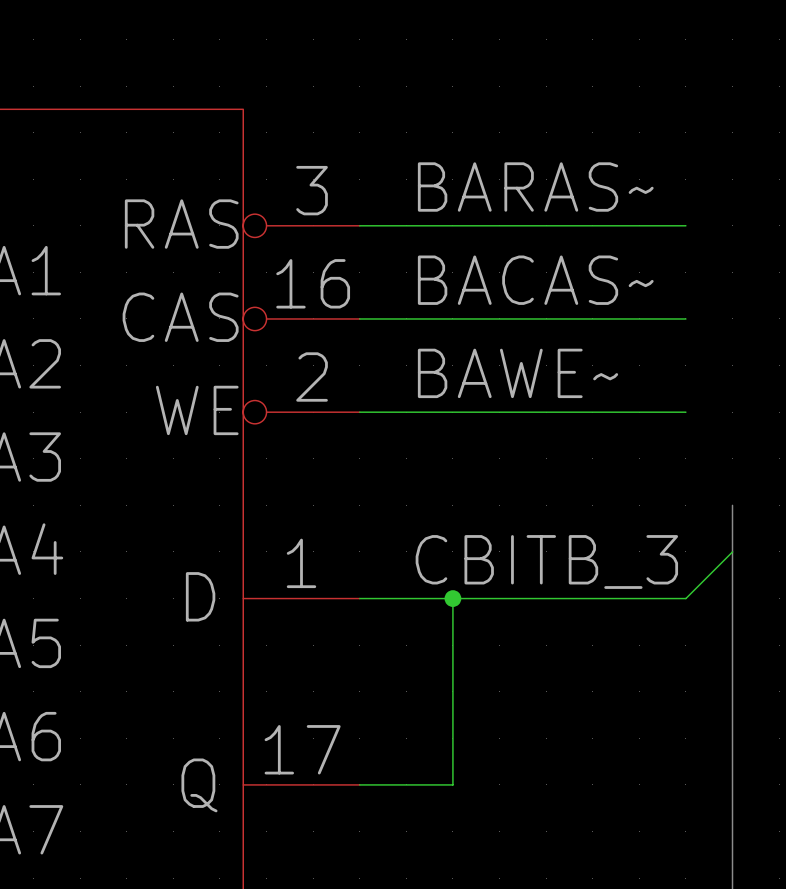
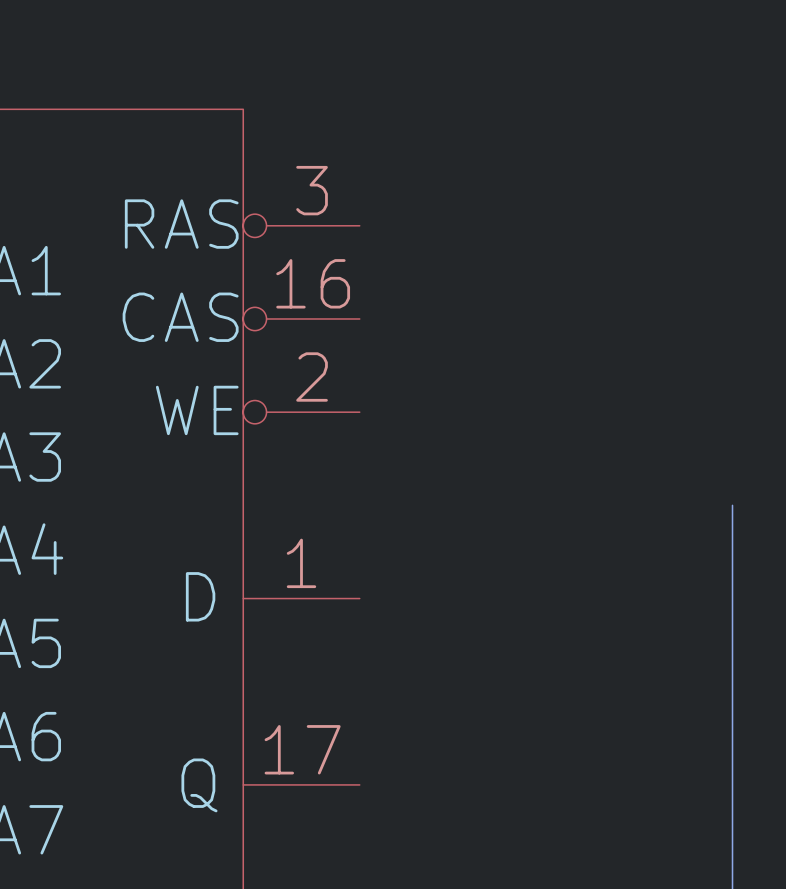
label: BARAS~ (535, 187) -> none
wire: (359, 225) (685, 225) -> none
label: BACAS~ (535, 280) -> none
wire: (359, 318) (685, 318) -> none
label: BAWE~ (518, 373) -> none
wire: (359, 412) (685, 412) -> none
wire: (732, 551) (685, 598) (359, 598) -> none
label: CBITB_3 (546, 561) -> none
wire: (452, 598) (452, 784) (359, 784) -> none
junction: (452, 598) -> none

